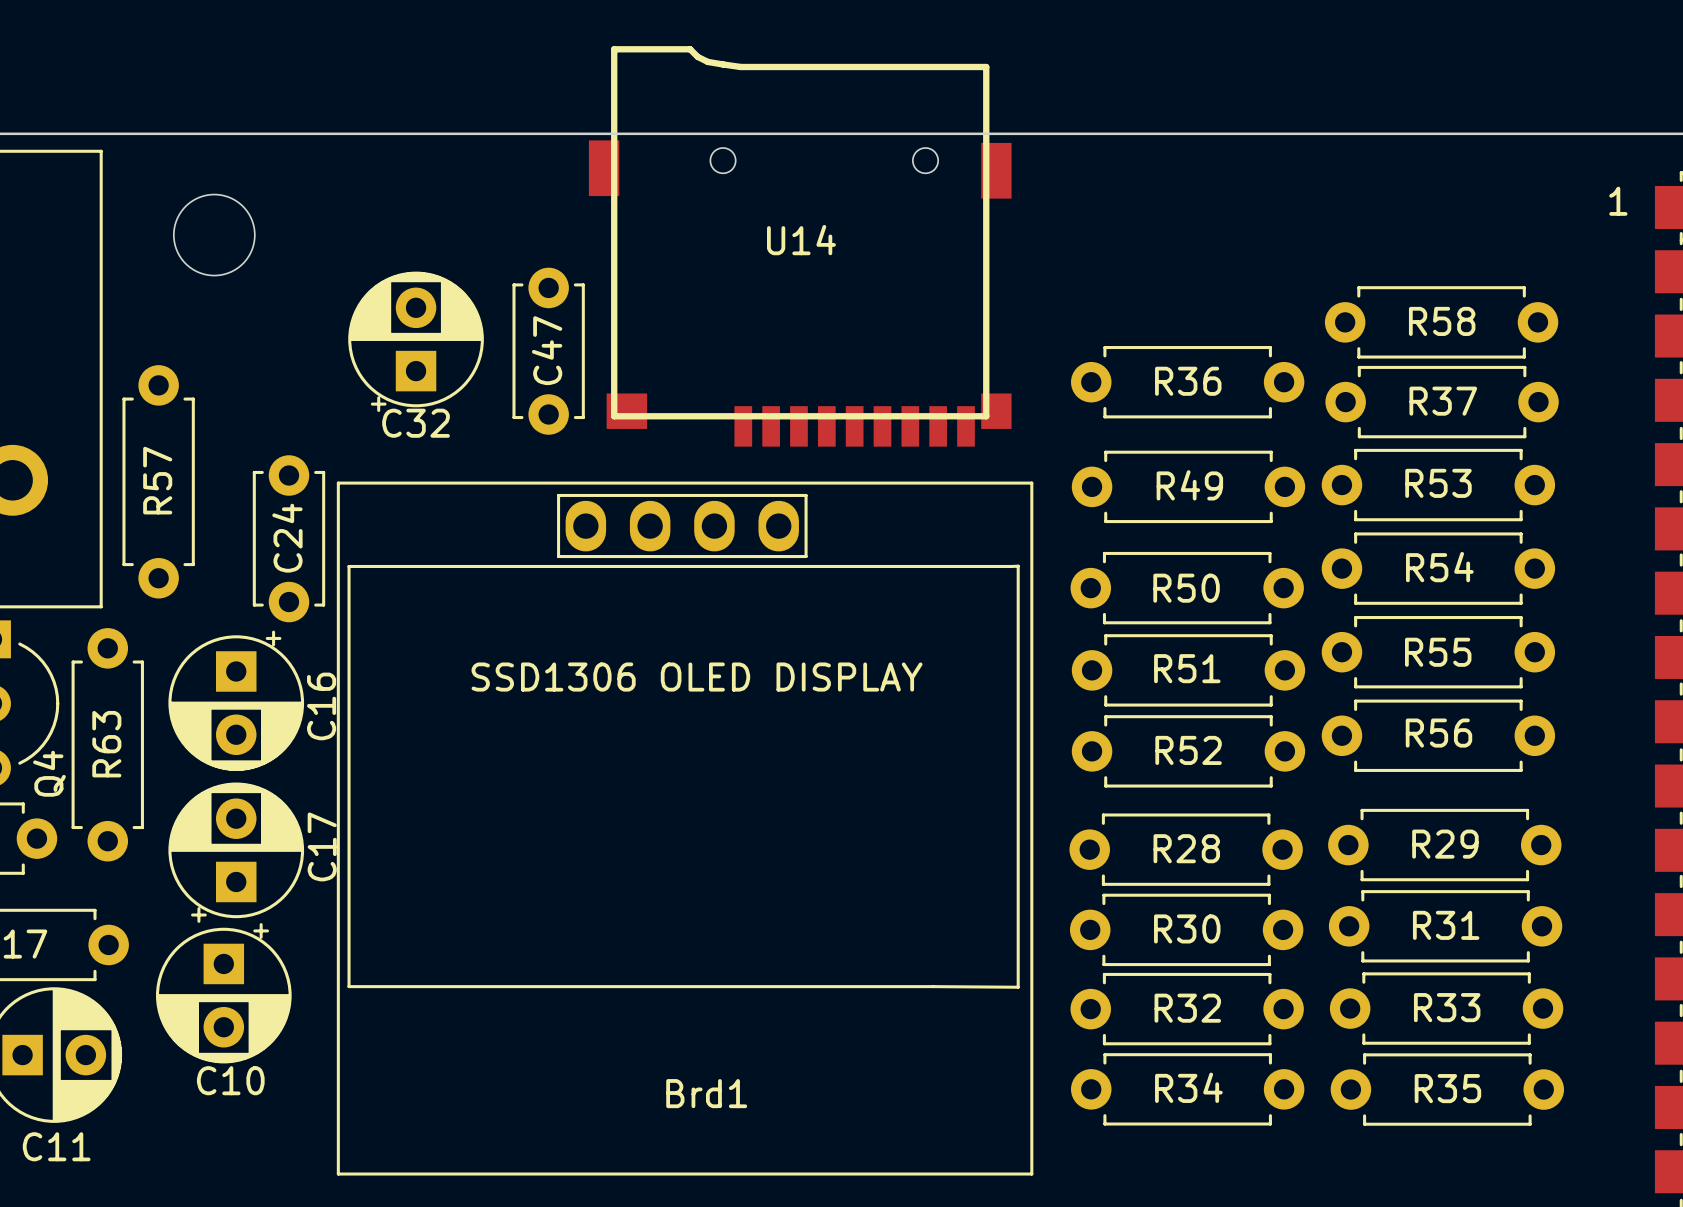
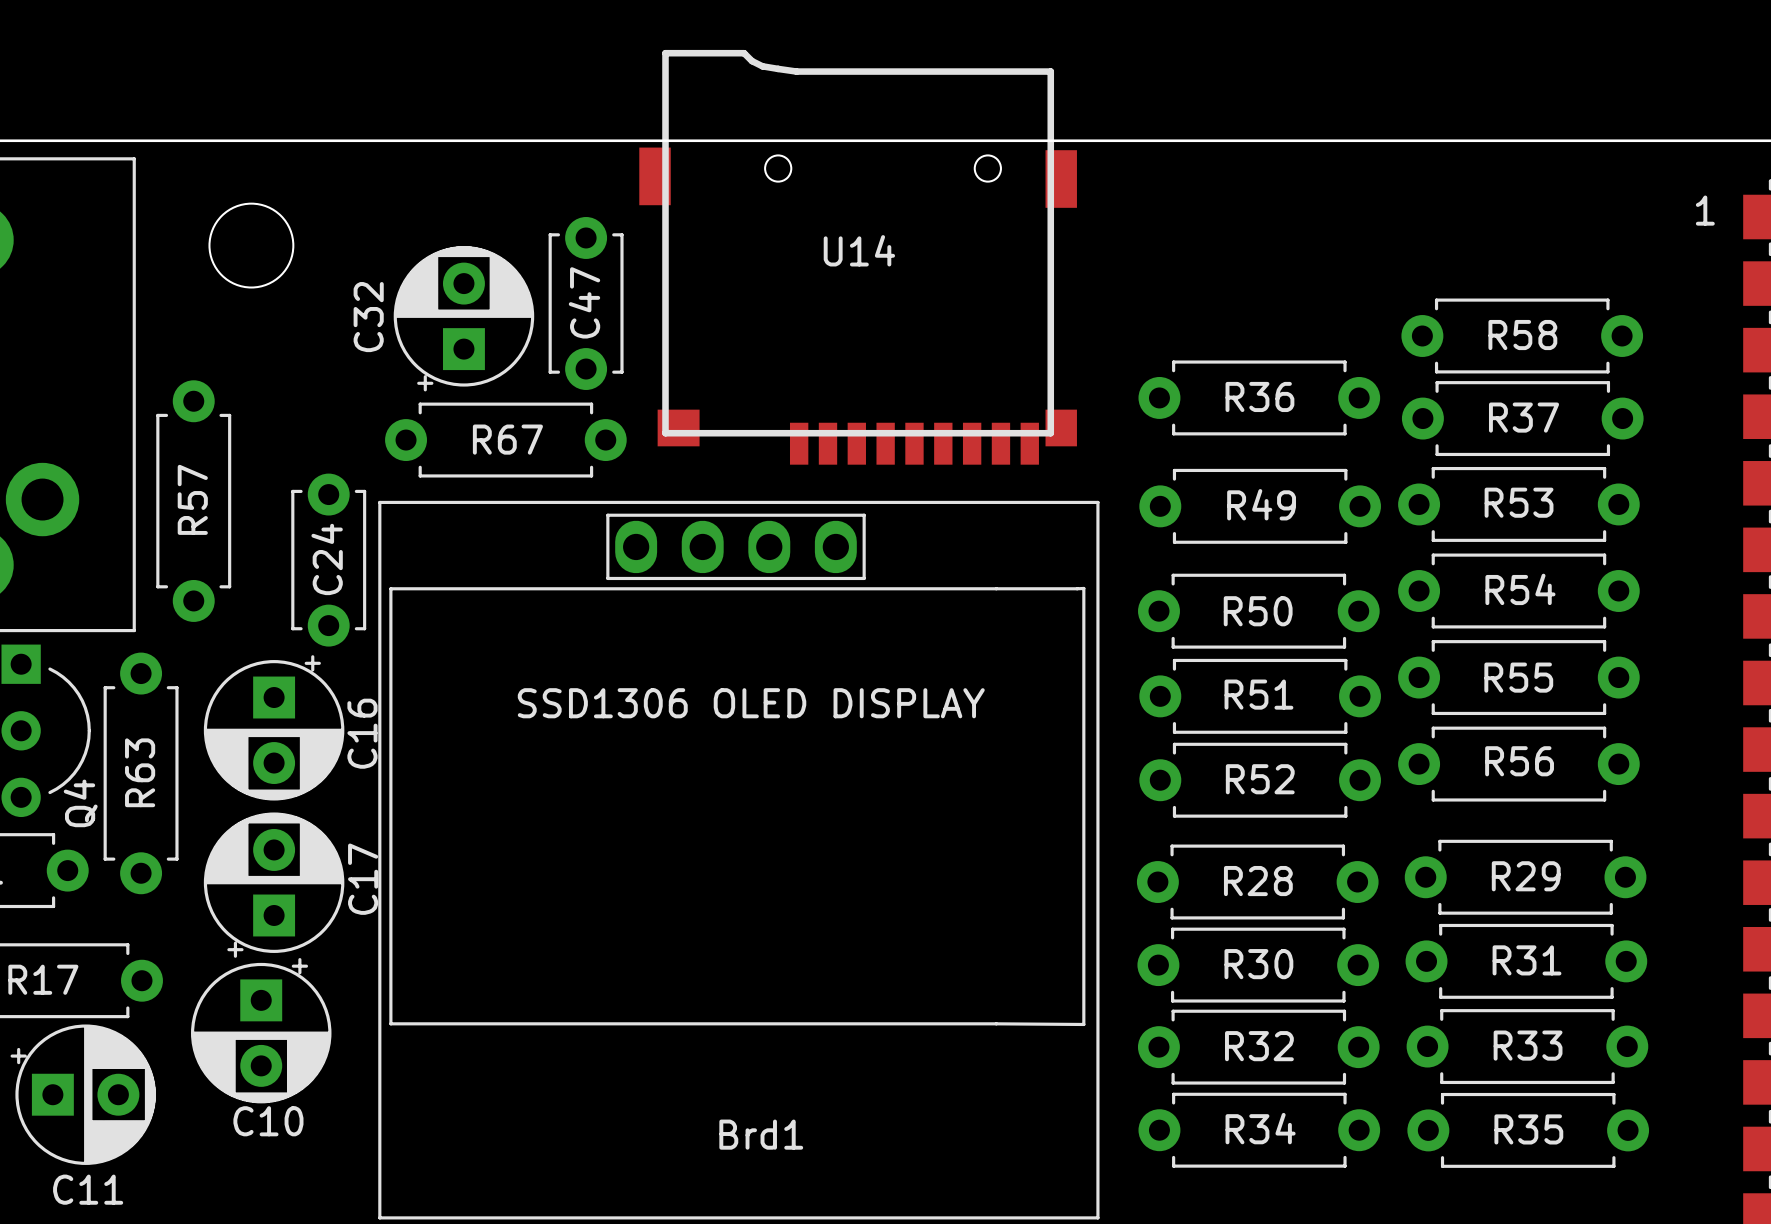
C32 position: (416, 341) -> (463, 318)
C47 position: (548, 351) -> (586, 303)
R67: none -> (505, 440)
C32 name rotation: 0° (416, 423) -> 90° counterclockwise (368, 317)
C32 name position: C32 (416, 423) -> C32 (368, 317)

